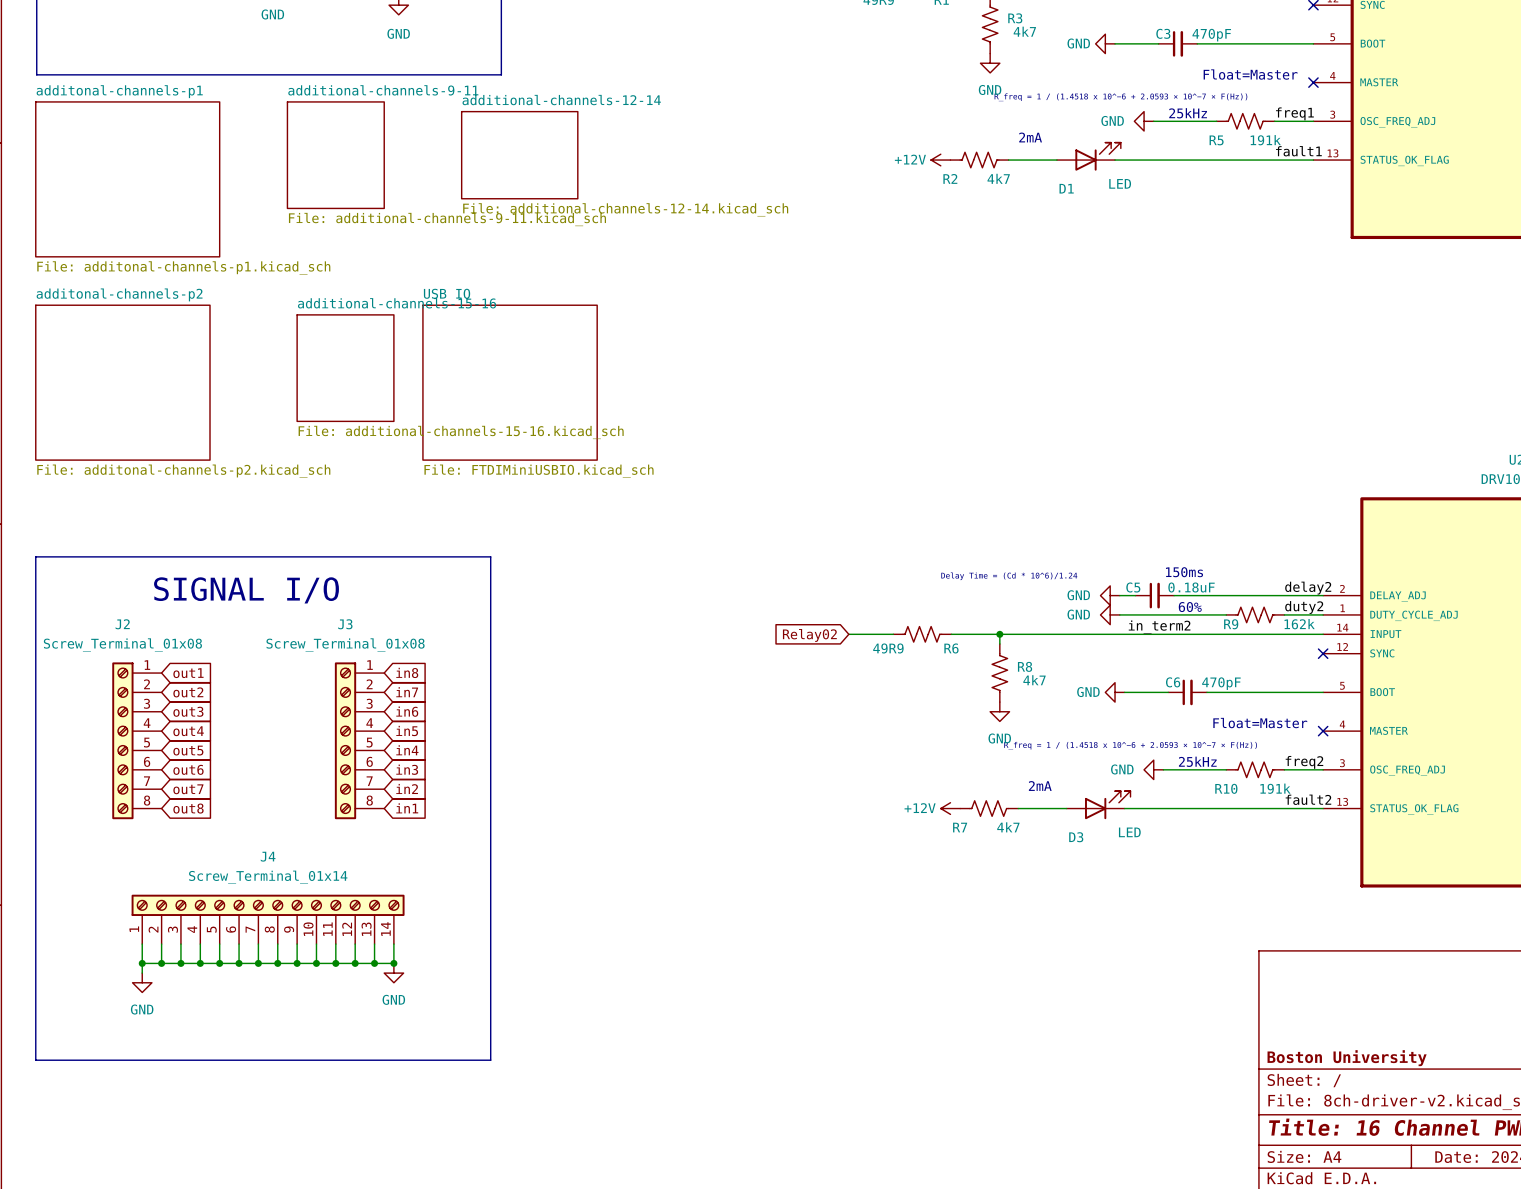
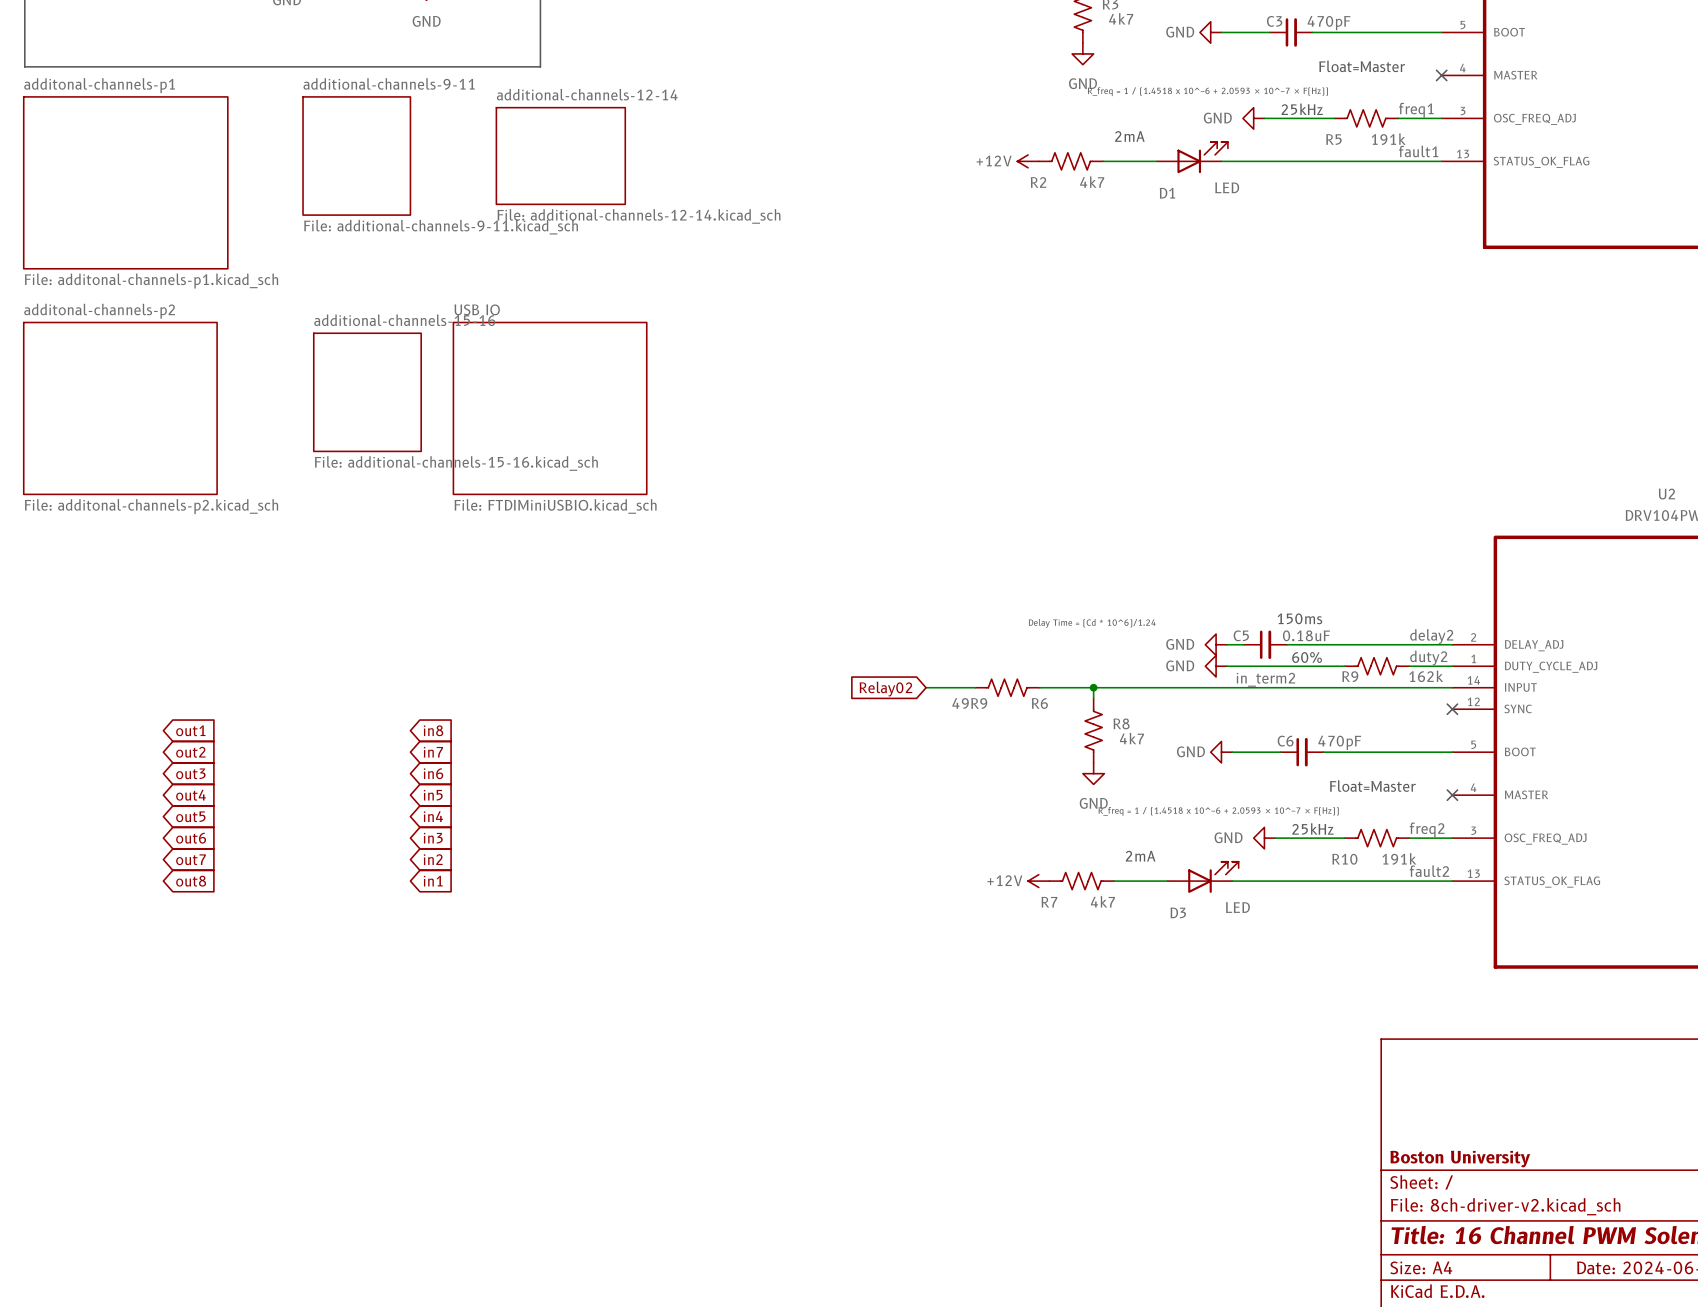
line: (35, 556) (490, 556) (490, 1060) (35, 1060) (35, 556) -> none
text: SIGNAL I/O (246, 590) -> none
J2: Screw_Terminal_01x08 (136, 740) -> none
J3: Screw_Terminal_01x08 (359, 740) -> none
J4: Screw_Terminal_01x14 (268, 919) -> none
wire: (142, 944) (142, 973) -> none
wire: (161, 944) (161, 963) -> none
wire: (180, 944) (180, 963) -> none
wire: (200, 944) (200, 963) -> none
wire: (219, 944) (219, 963) -> none
wire: (239, 944) (239, 963) -> none
wire: (258, 944) (258, 963) -> none
wire: (277, 944) (277, 963) -> none
wire: (297, 944) (297, 963) -> none
wire: (316, 944) (316, 963) -> none
wire: (335, 944) (335, 963) -> none
wire: (355, 944) (355, 963) -> none
wire: (374, 944) (374, 963) -> none
wire: (393, 944) (393, 963) (142, 963) -> none
junction: (142, 963) -> none
junction: (161, 963) -> none
junction: (180, 963) -> none
junction: (200, 963) -> none
junction: (219, 963) -> none
junction: (239, 963) -> none
junction: (258, 963) -> none
junction: (277, 963) -> none
junction: (297, 963) -> none
junction: (316, 963) -> none
junction: (335, 963) -> none
junction: (355, 963) -> none
junction: (374, 963) -> none
junction: (393, 963) -> none
power symbol: GND (393, 973) -> none
power symbol: GND (142, 982) -> none

